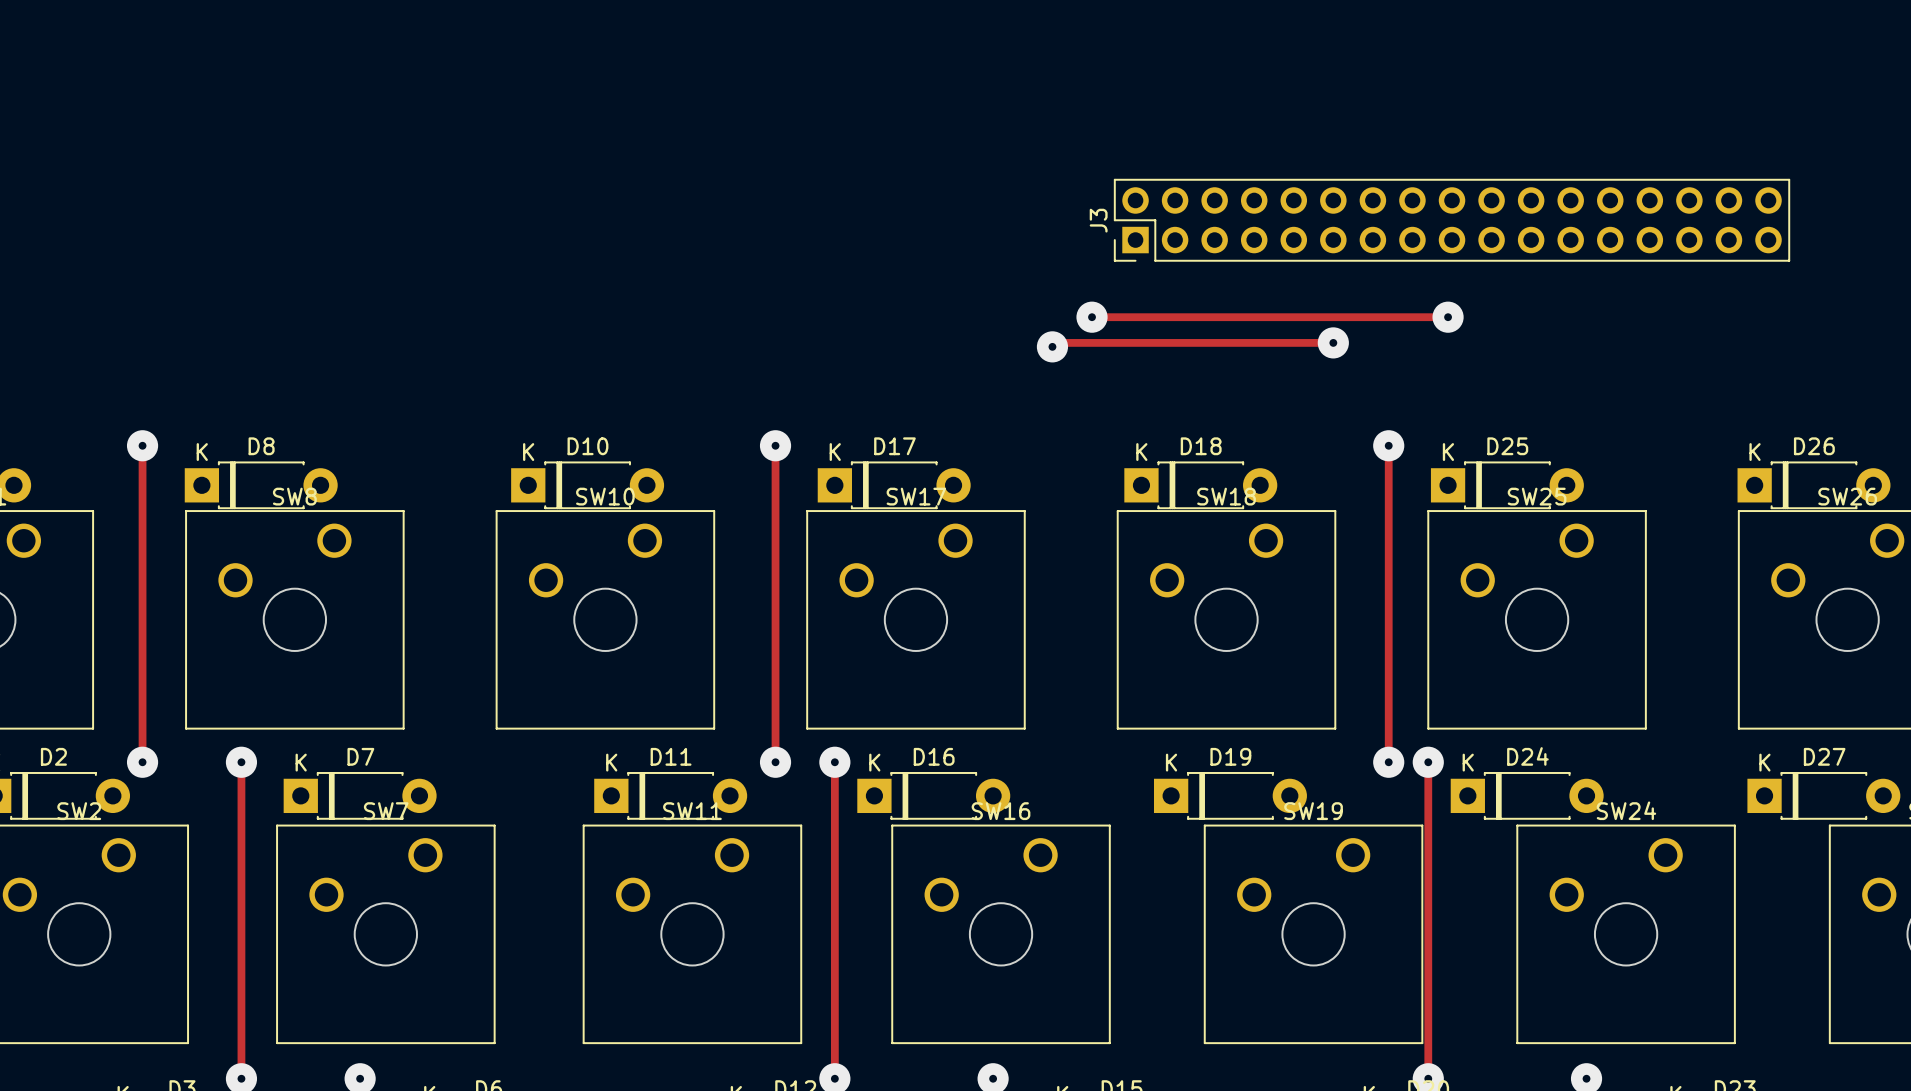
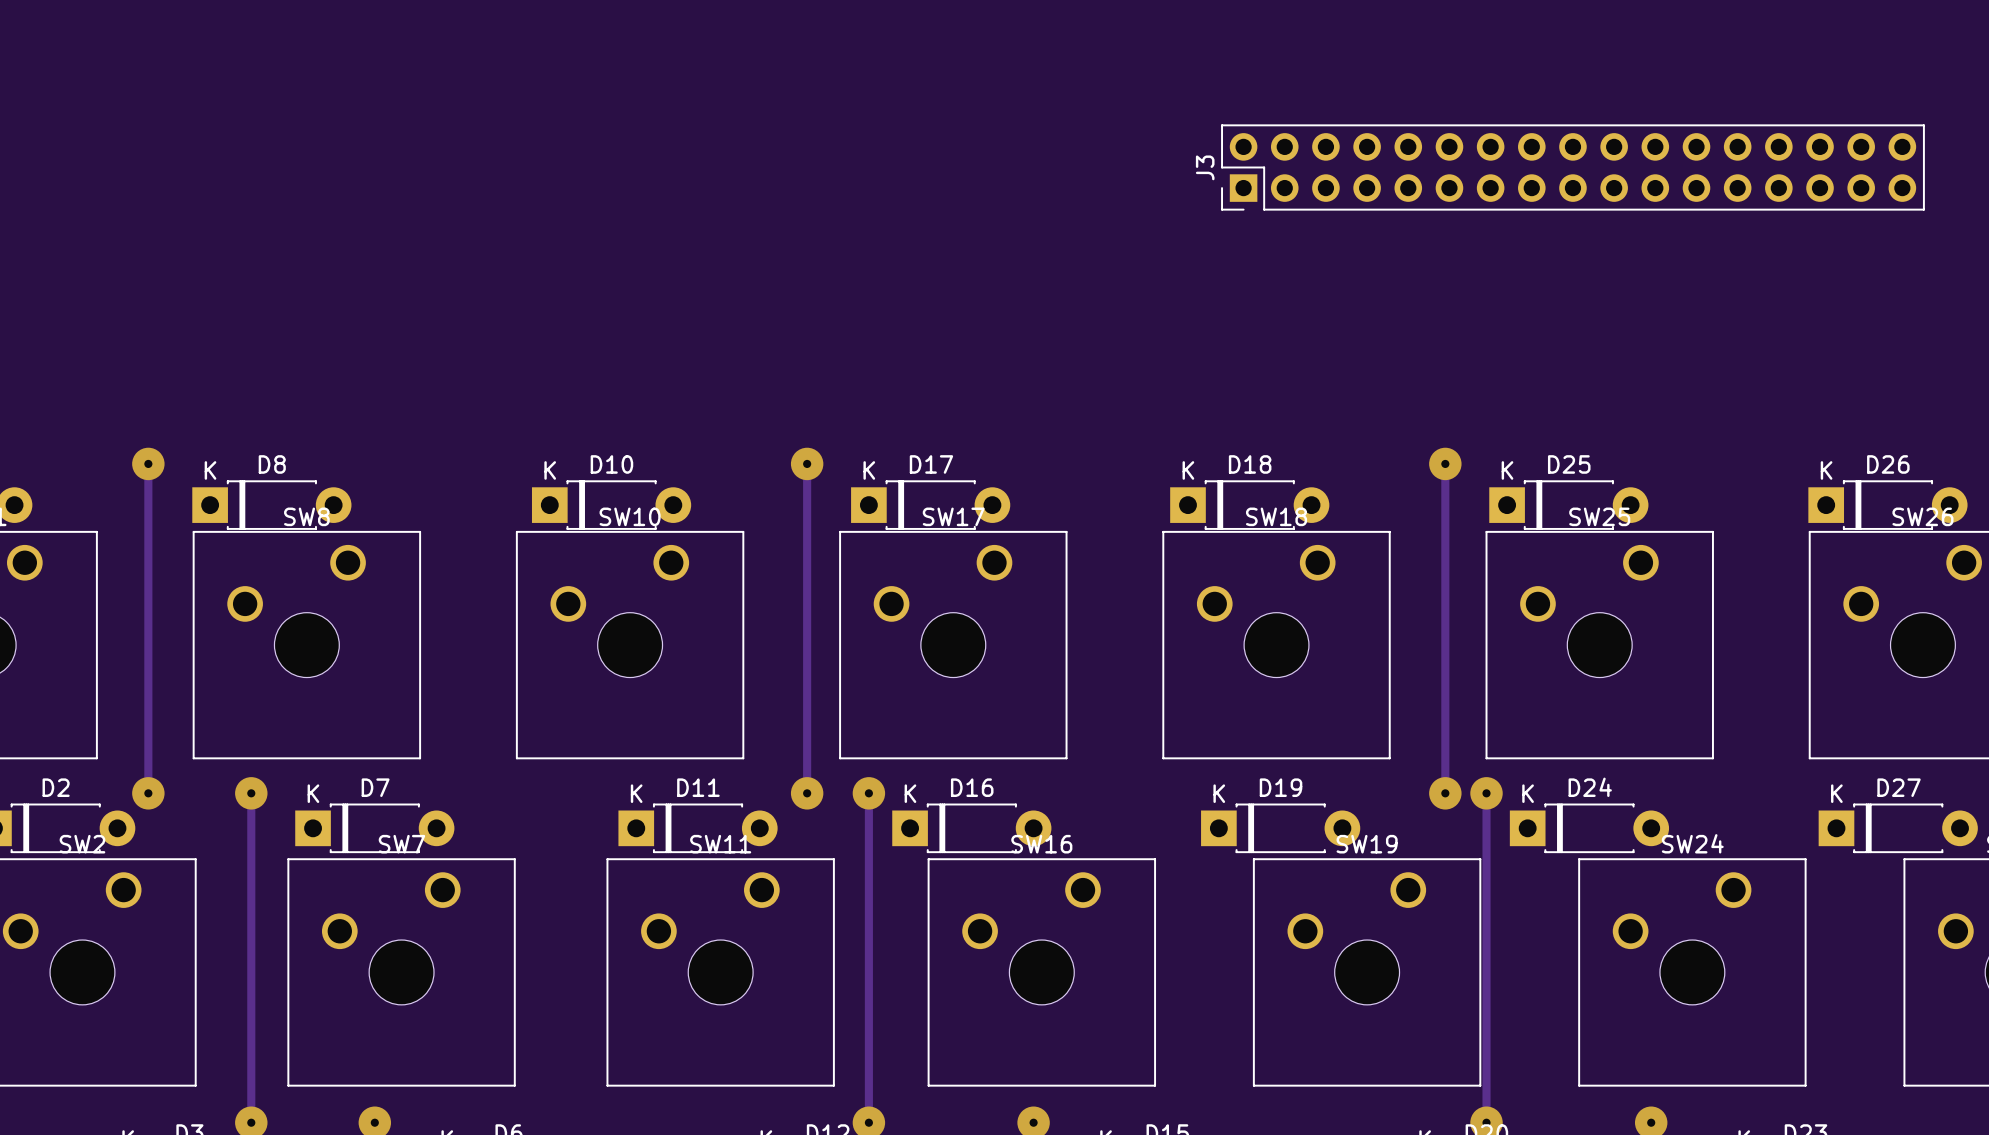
J3 position: (1452, 220) -> (1572, 167)
track: (1092, 317) (1448, 317) -> none
via: (1092, 317) -> none
via: (1448, 317) -> none
track: (1333, 342) (1056, 342) (1052, 346) -> none
via: (1333, 342) -> none
via: (1052, 346) -> none

